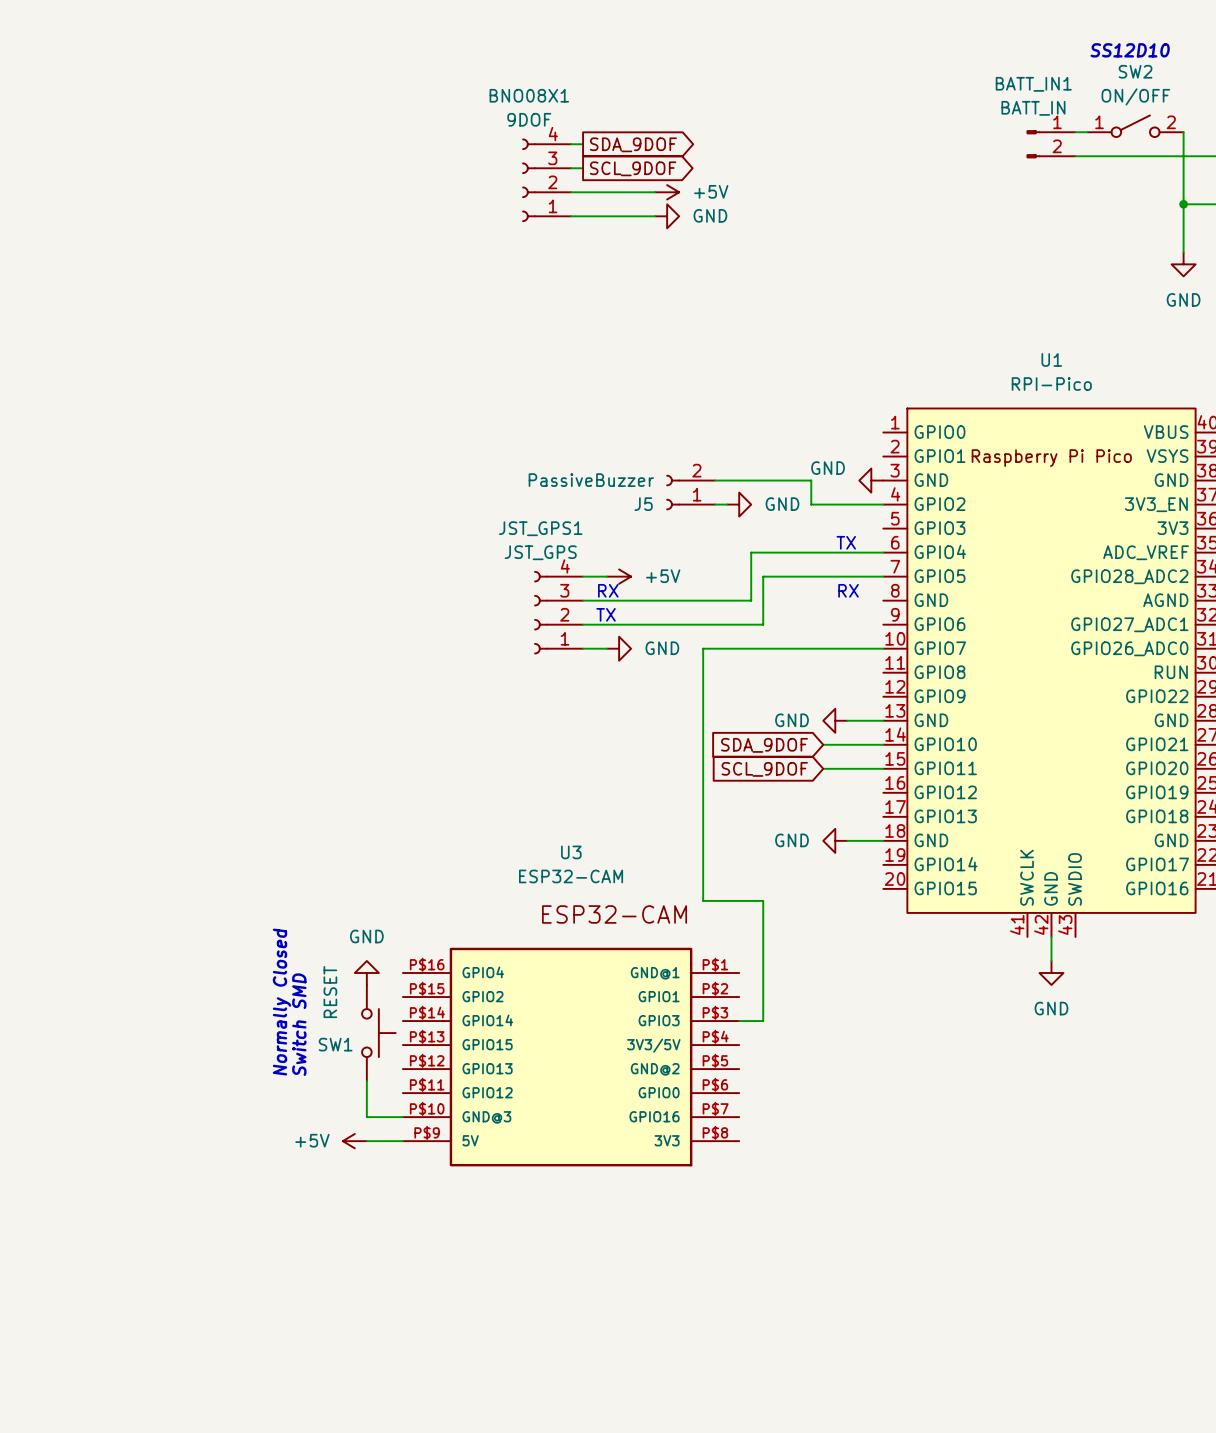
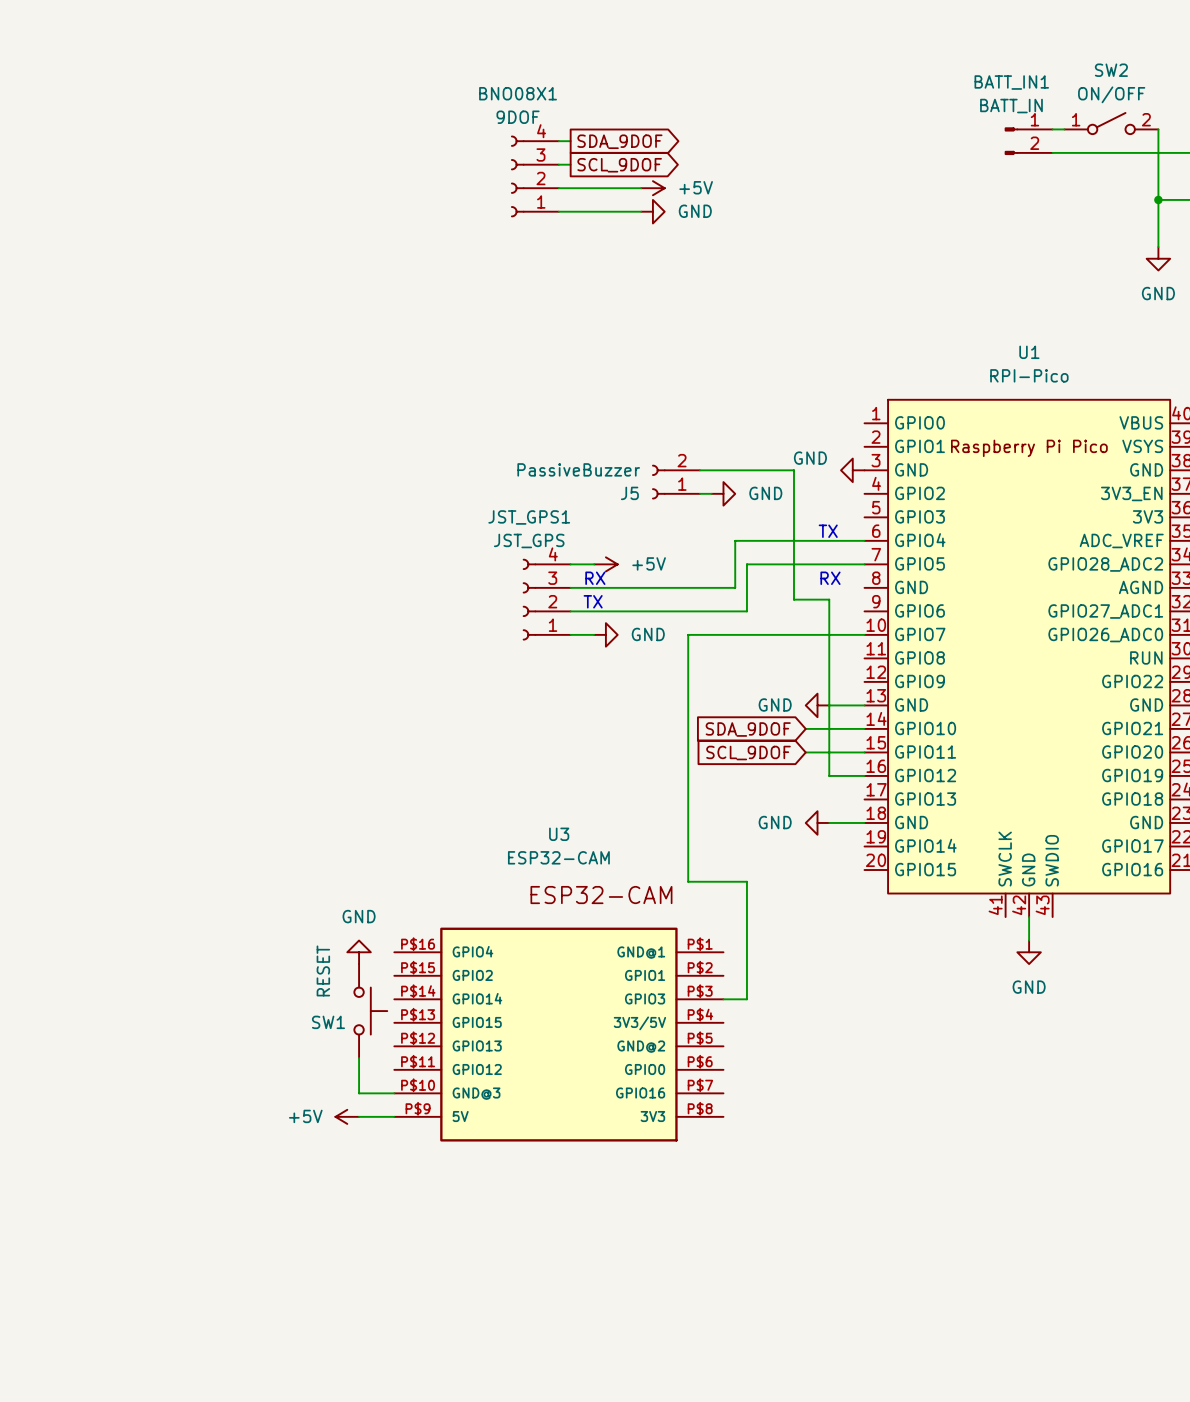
text: SS12D10 (1130, 50) -> none
wire: (811, 504) (883, 504) -> (794, 493) (794, 599) (829, 599) (829, 775) (864, 775)
text: Normally Closed (282, 1002) -> none
text: Switch SMD (299, 1024) -> none

